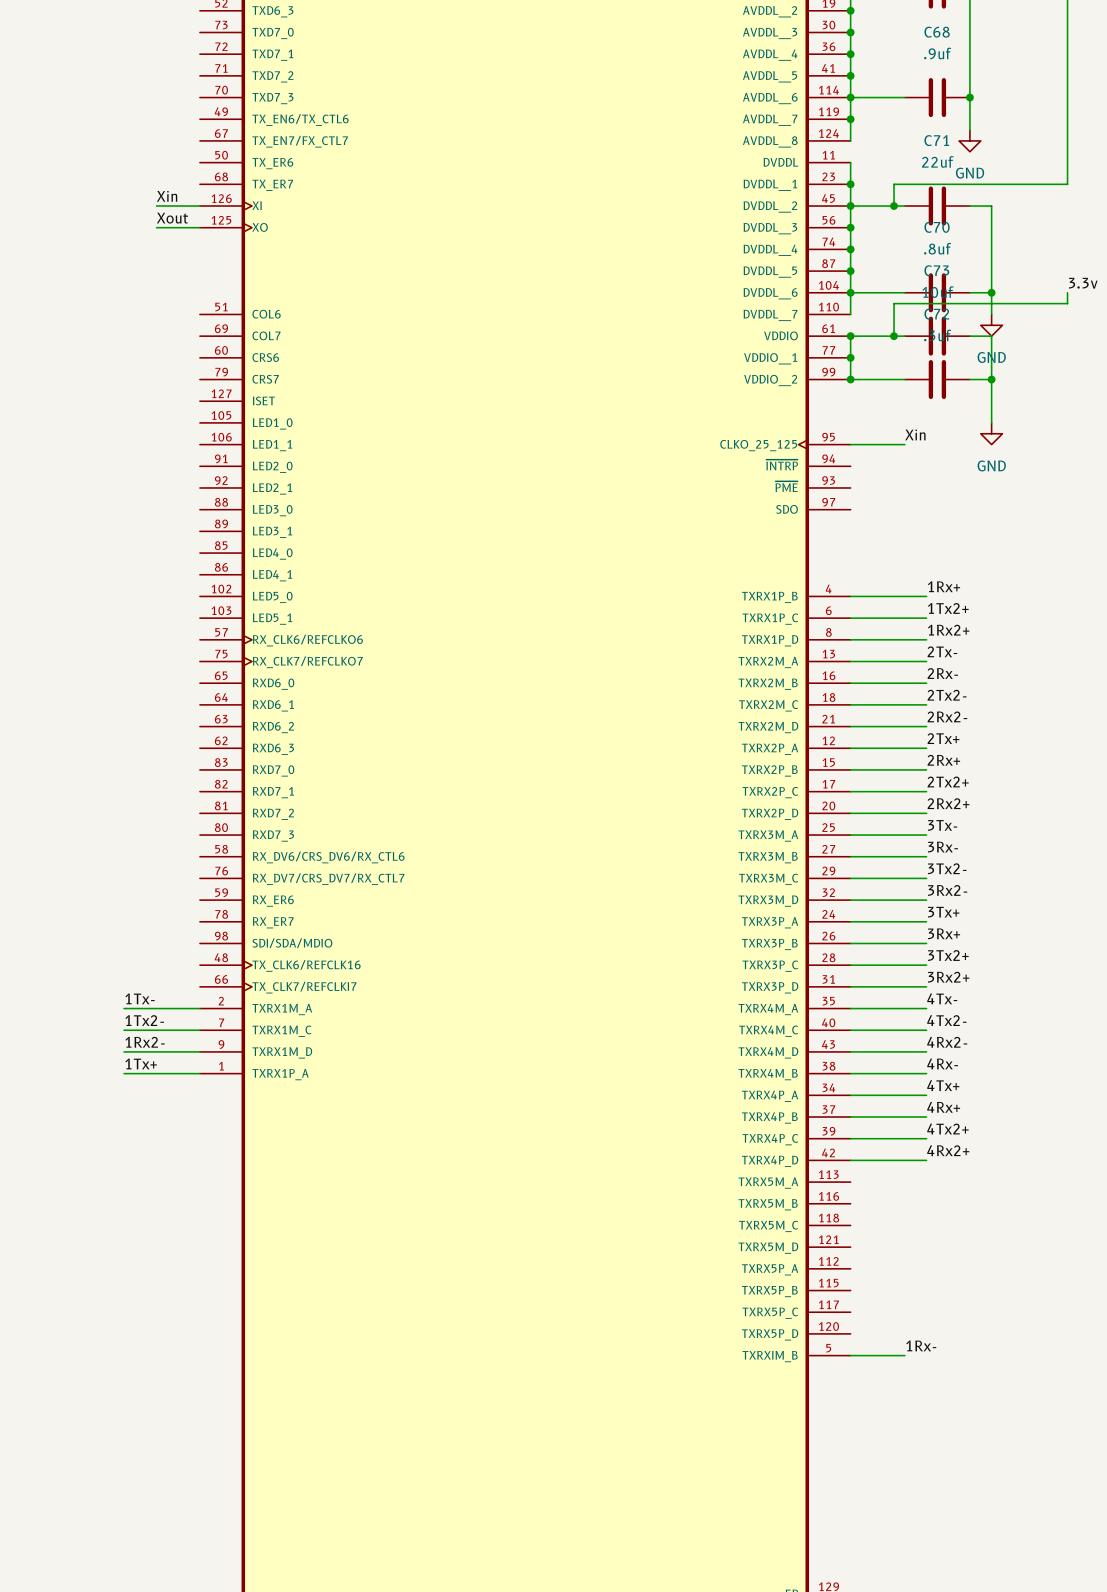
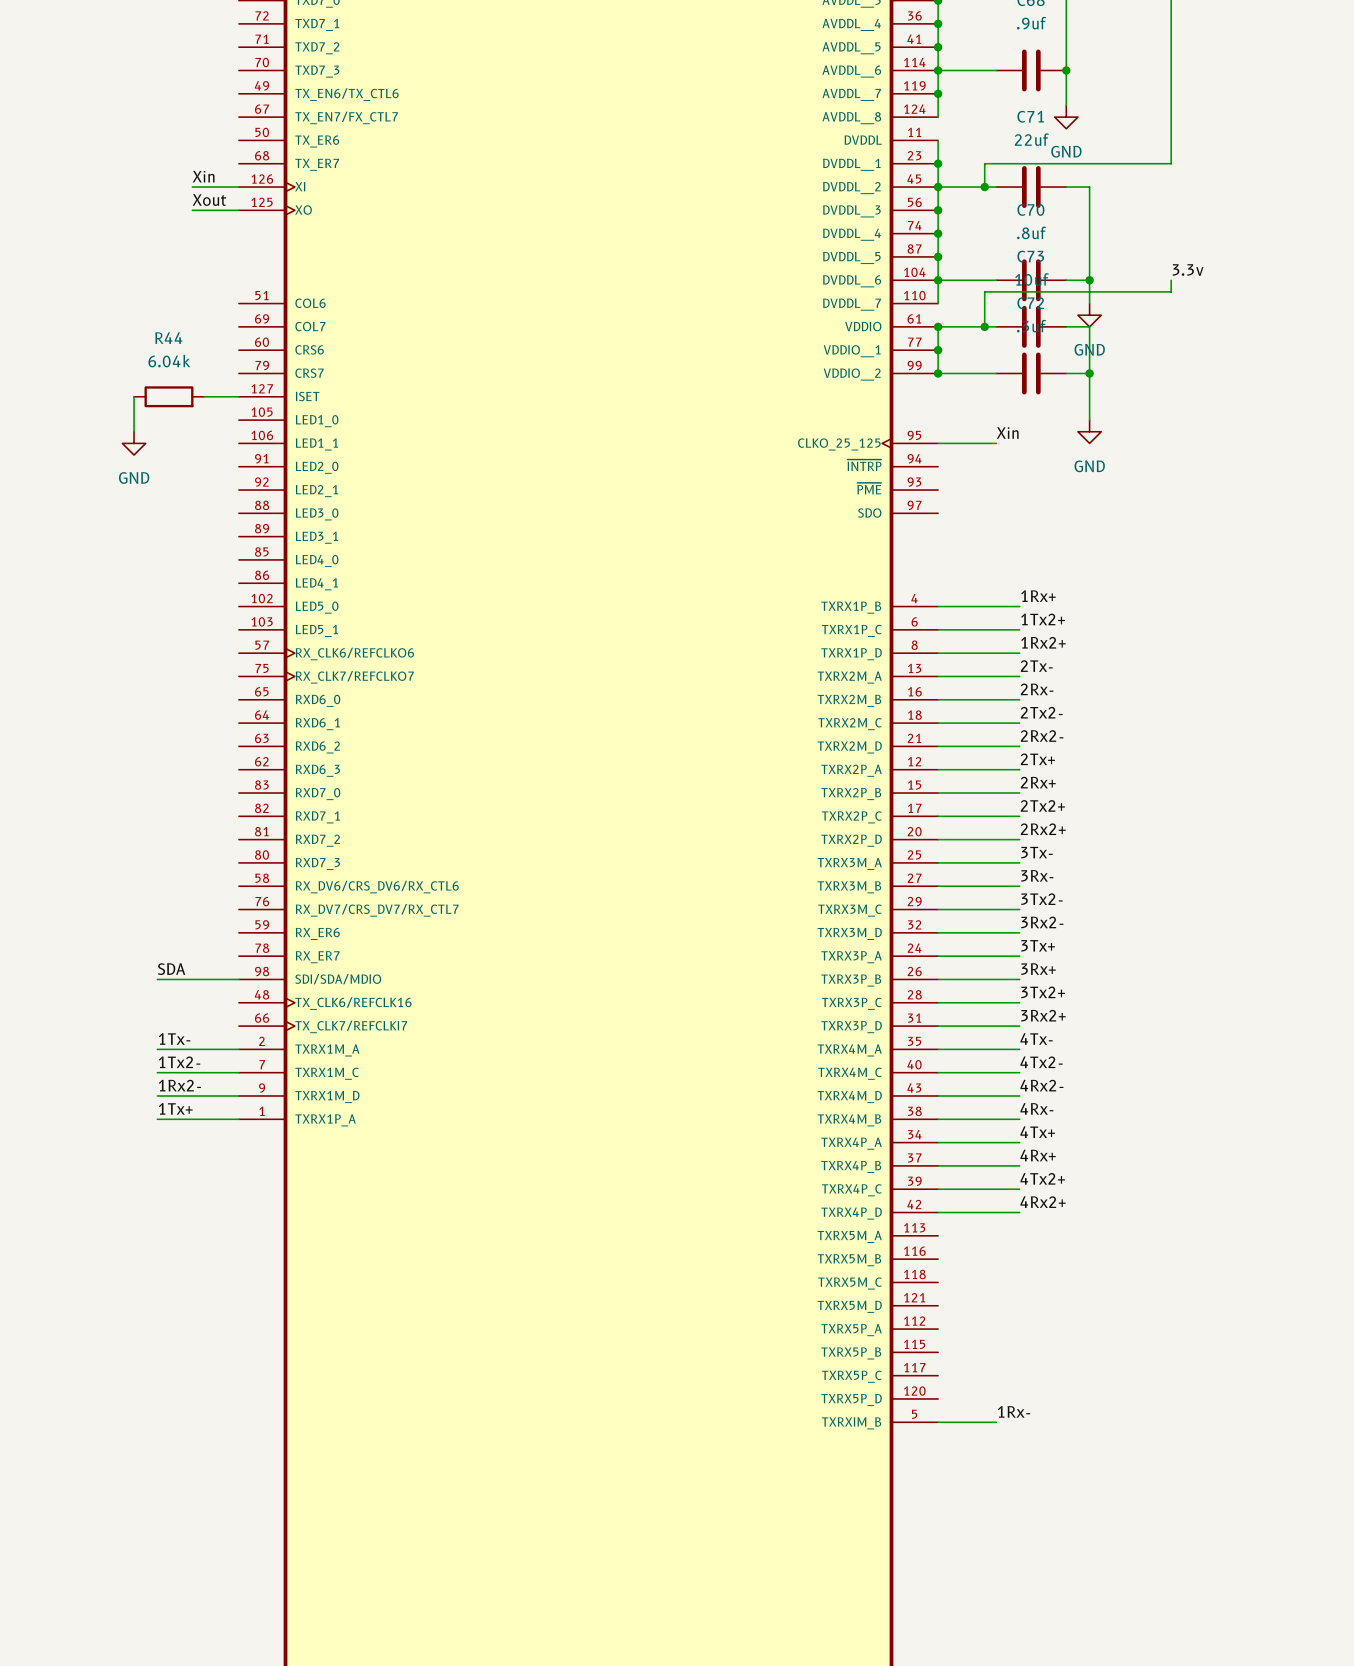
wire: none -> (134, 396) (134, 431)
R44: none -> 6.04k (168, 396)
wire: none -> (203, 396) (238, 396)
power symbol: none -> GND (134, 443)
label: none -> SDA (171, 969)
wire: none -> (157, 979) (238, 979)

